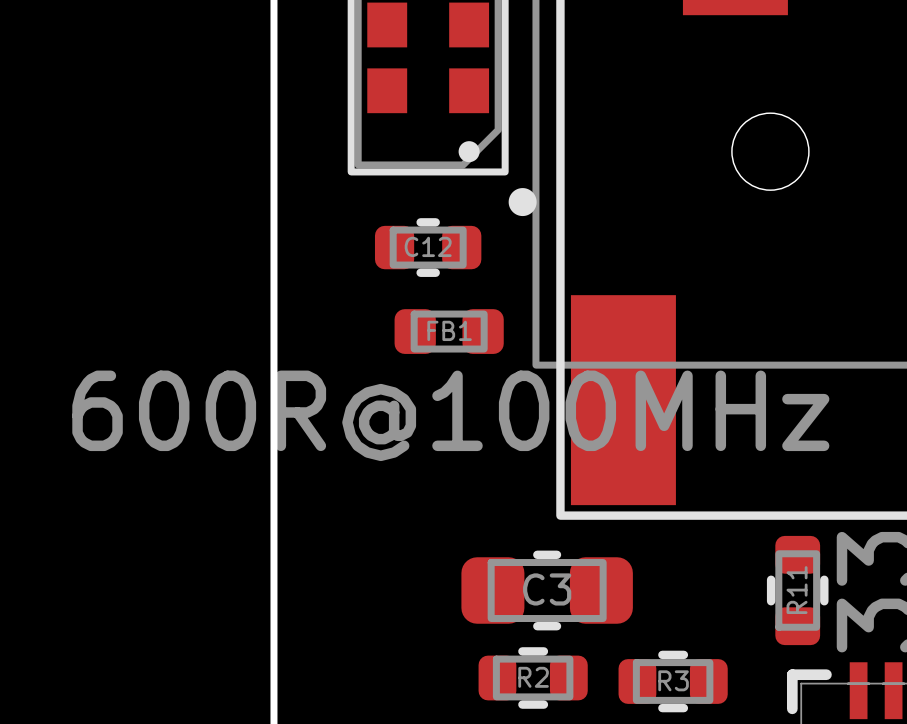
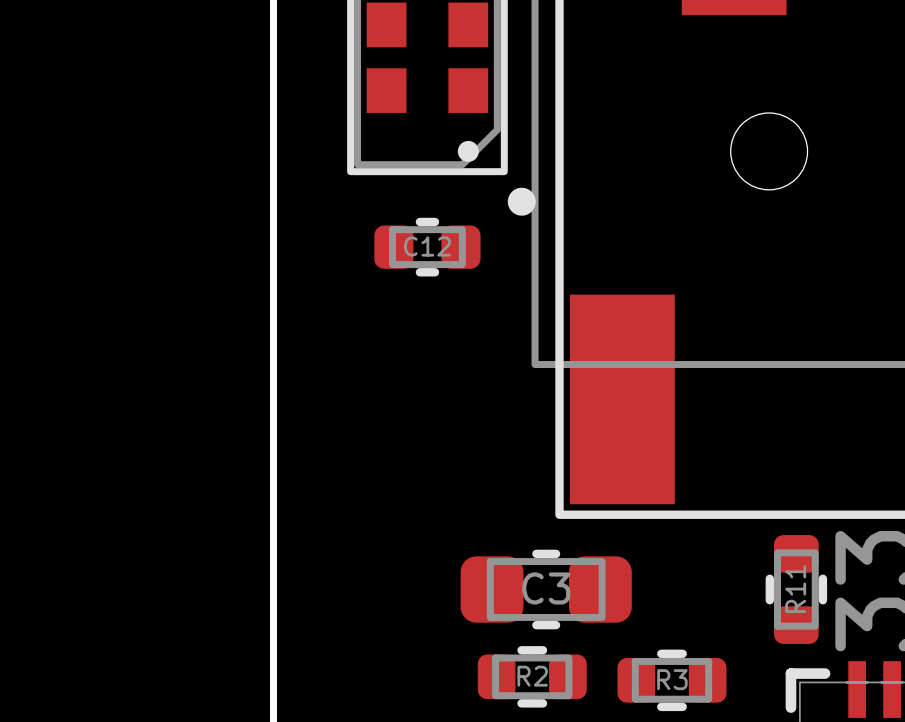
FB1: 600R@100MHz (449, 331) -> none

